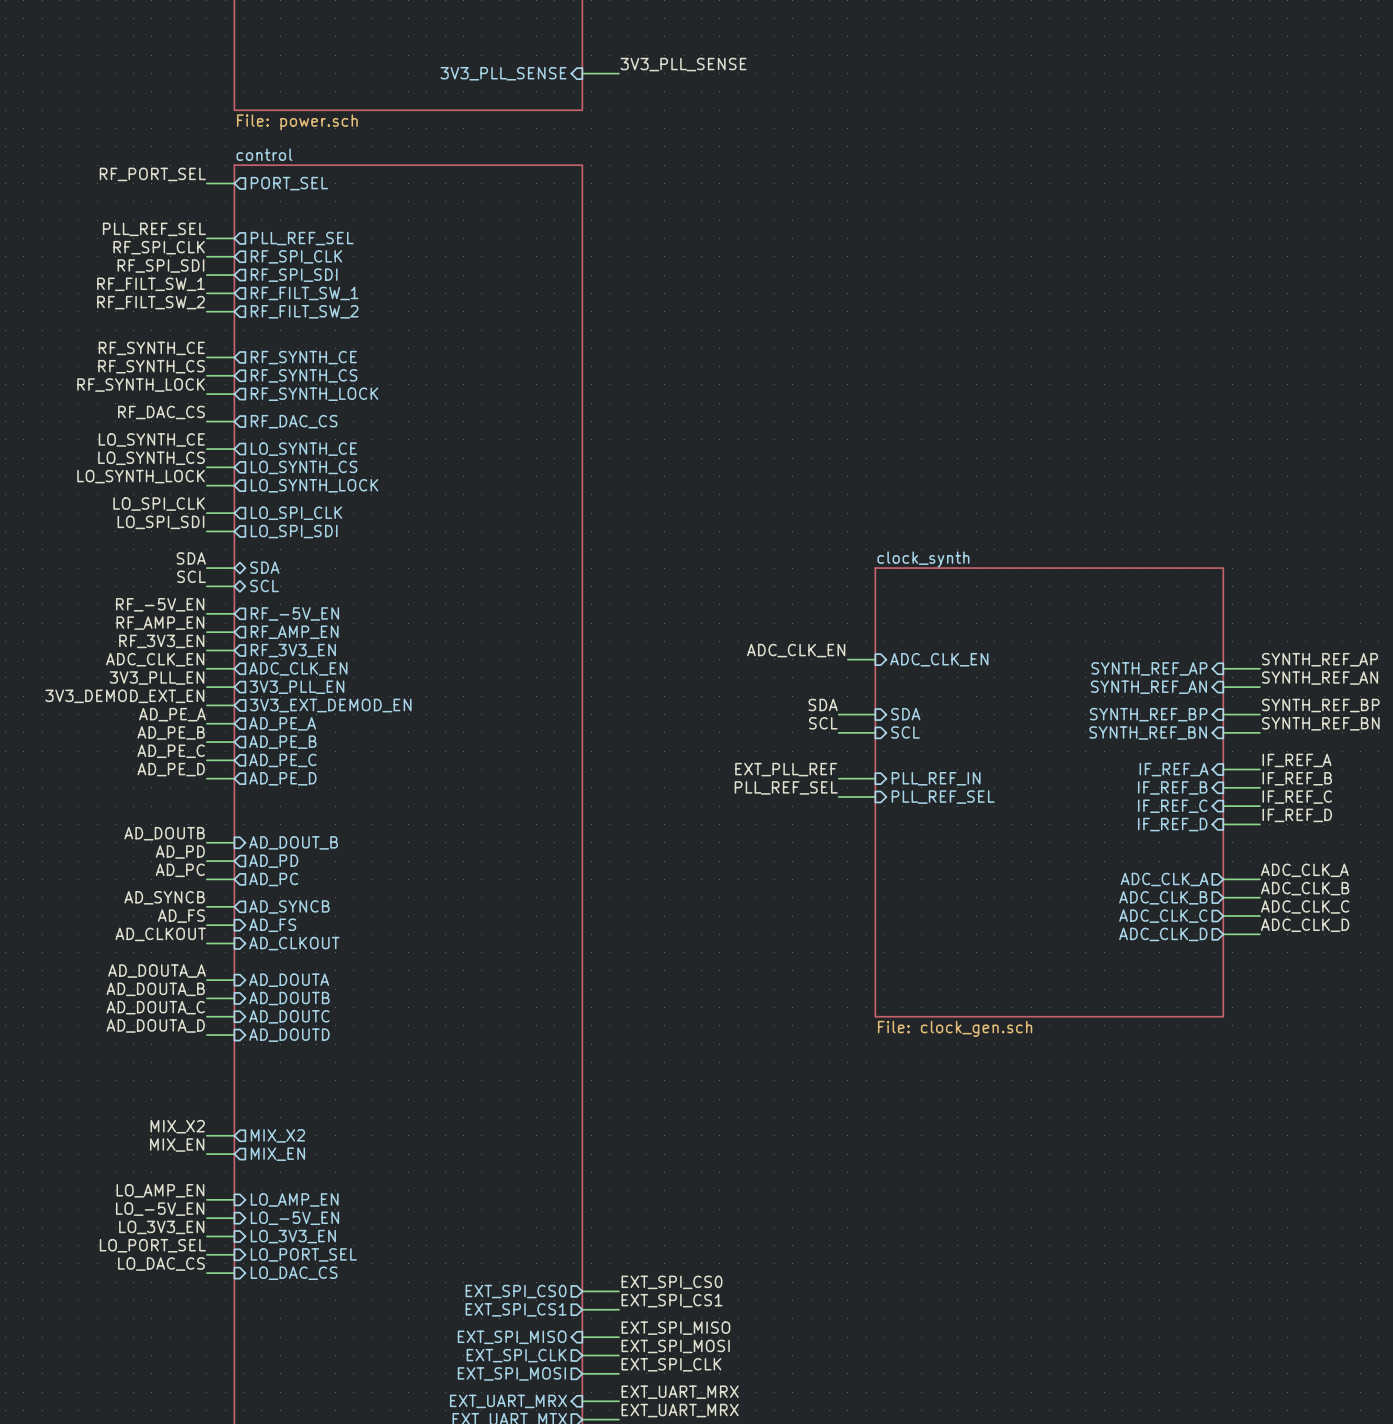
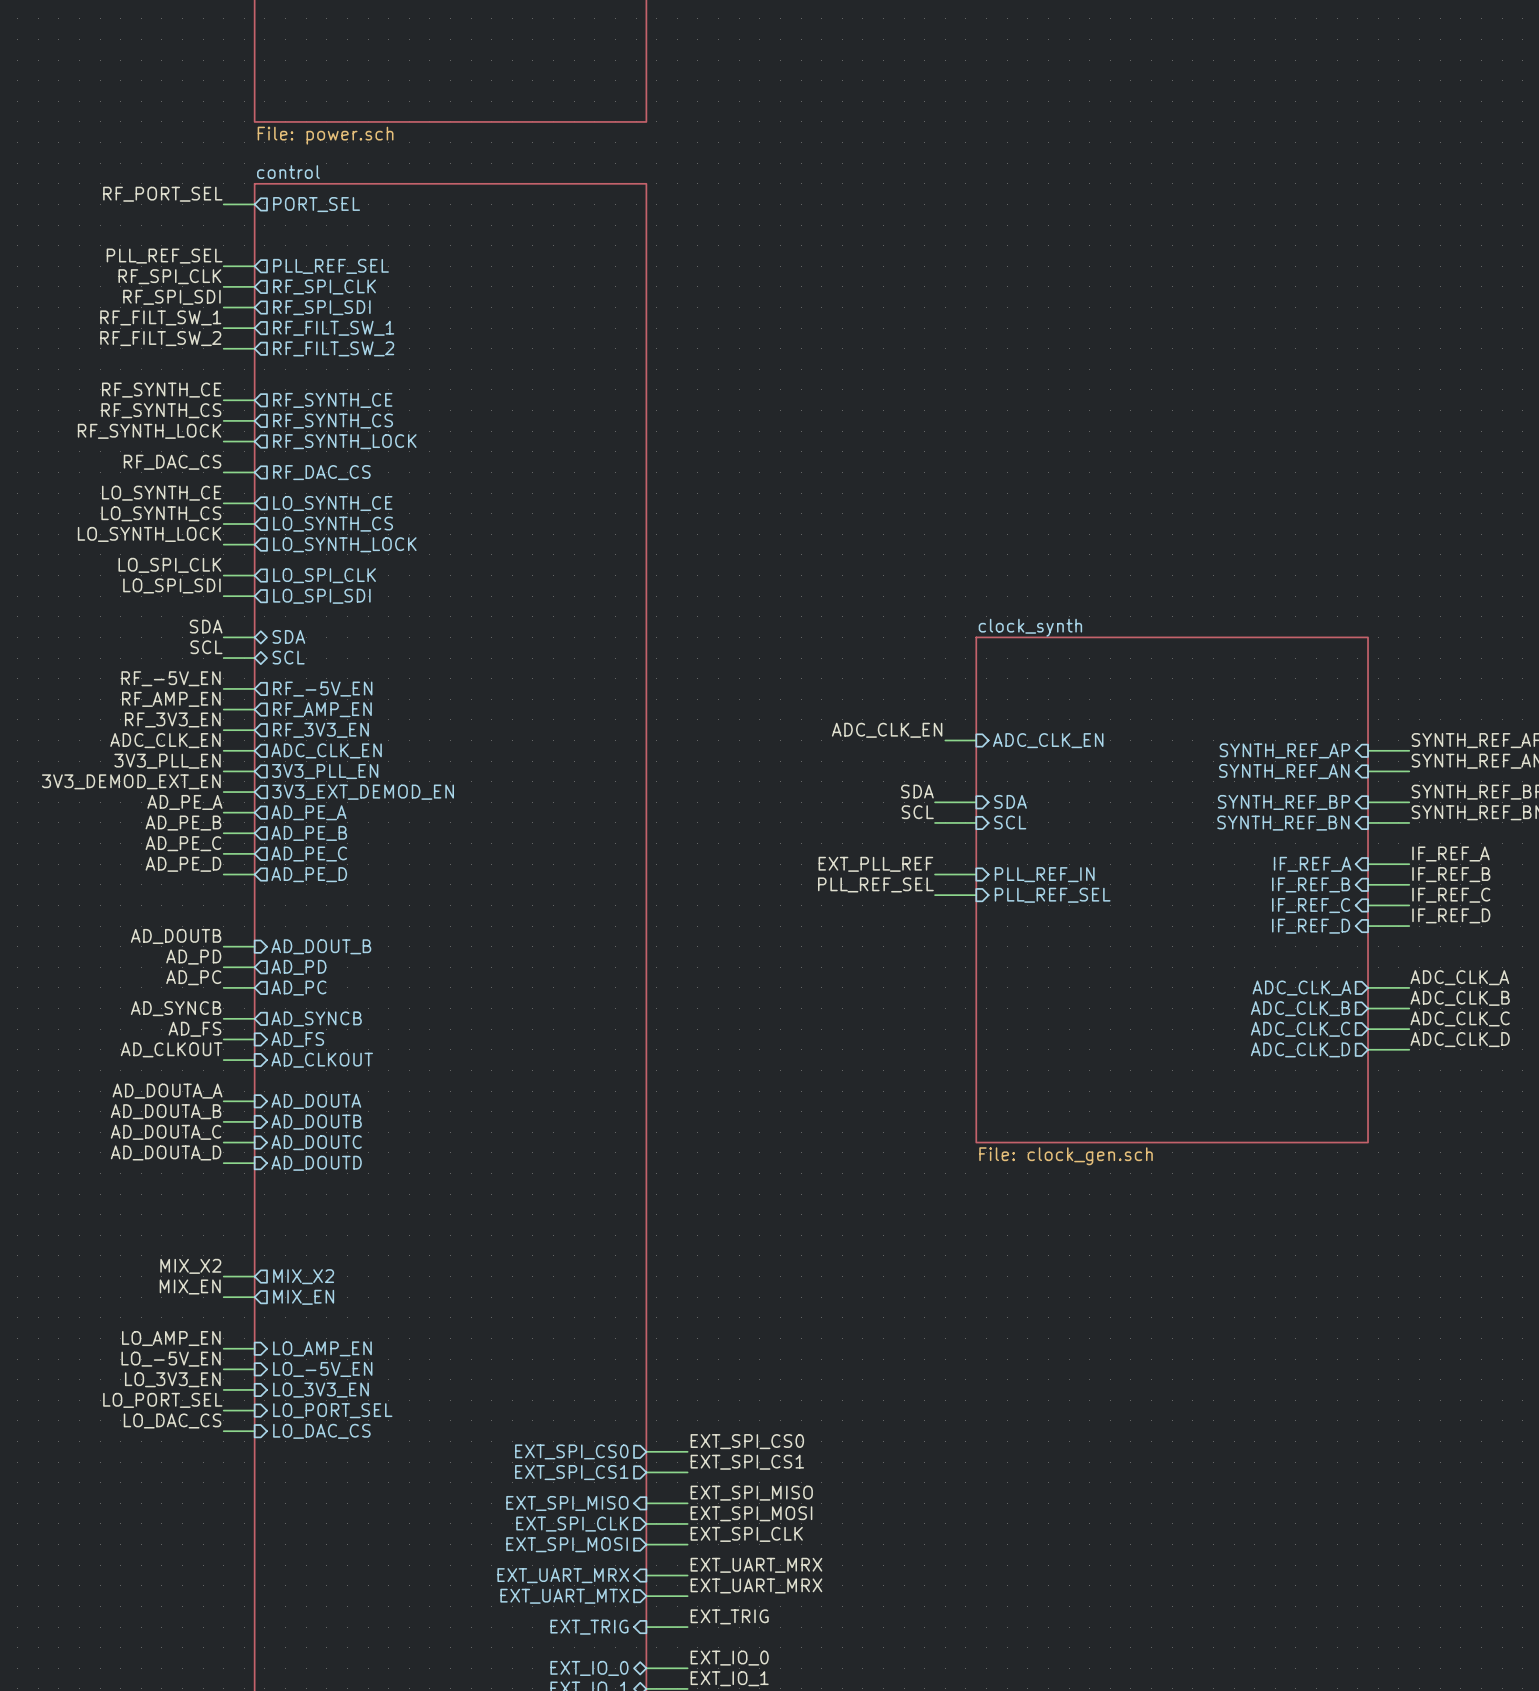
label: 3V3_PLL_SENSE (683, 64) -> none
sheet pin: 3V3_PLL_SENSE (503, 73) -> none
wire: (582, 73) (618, 73) -> none

